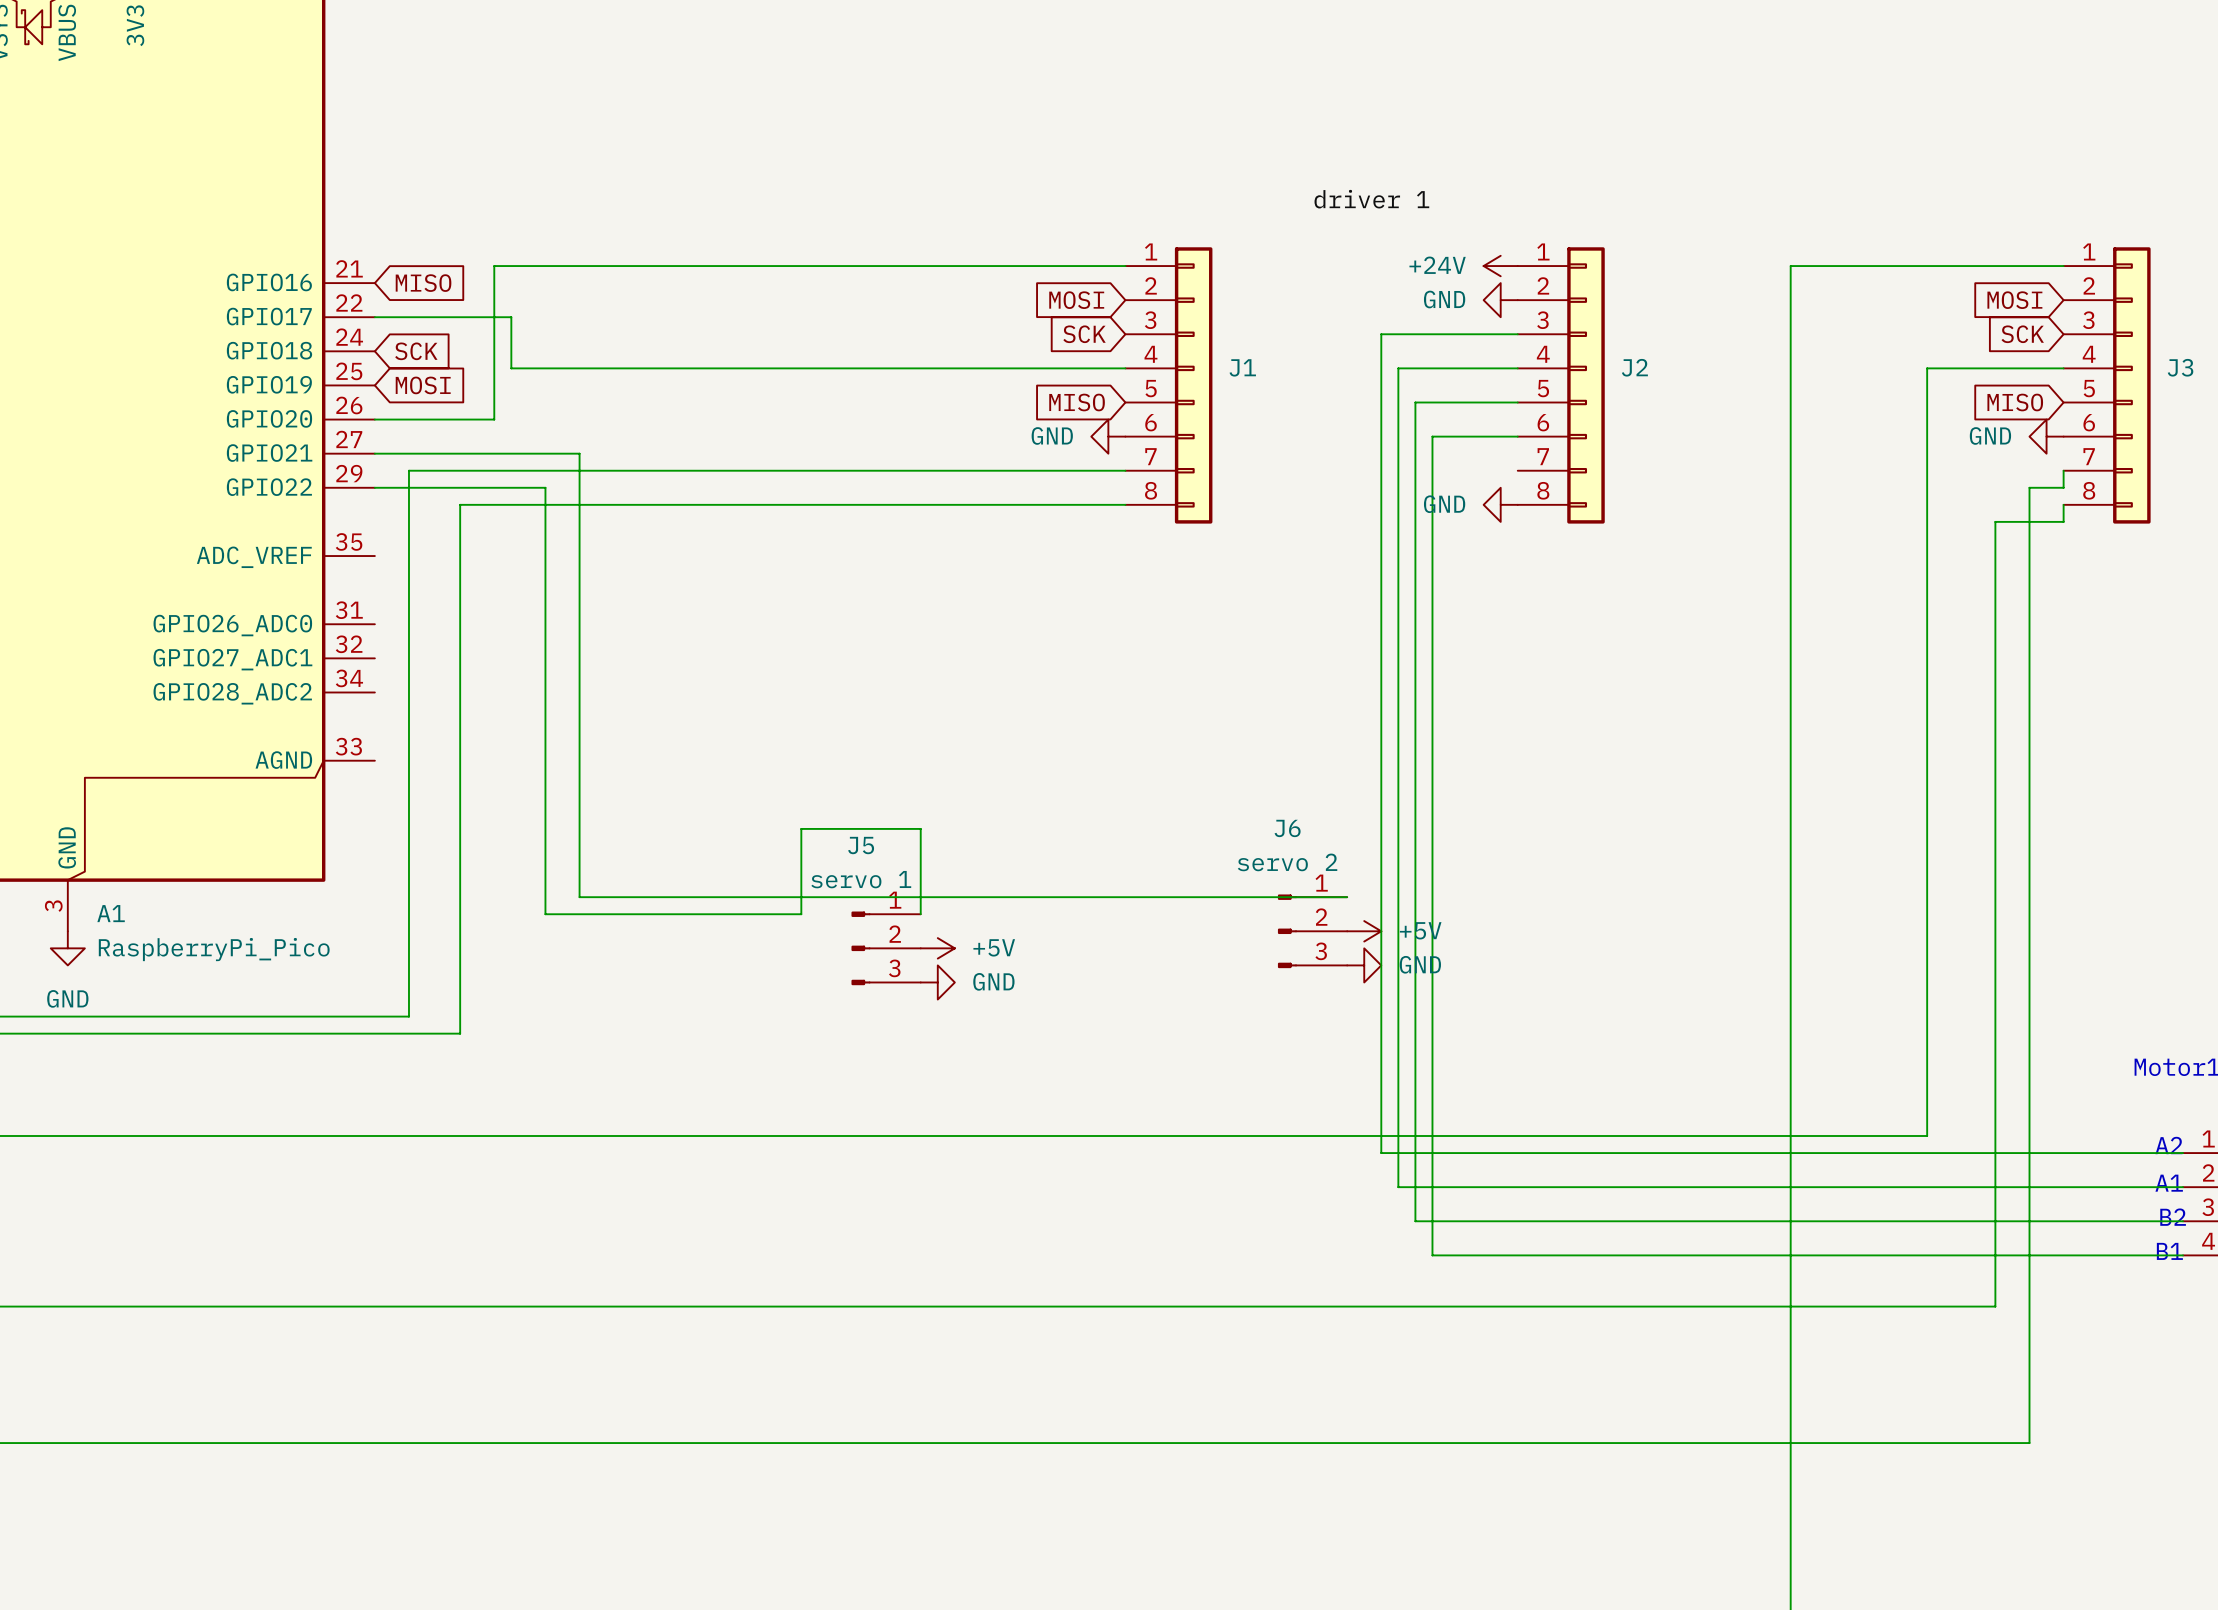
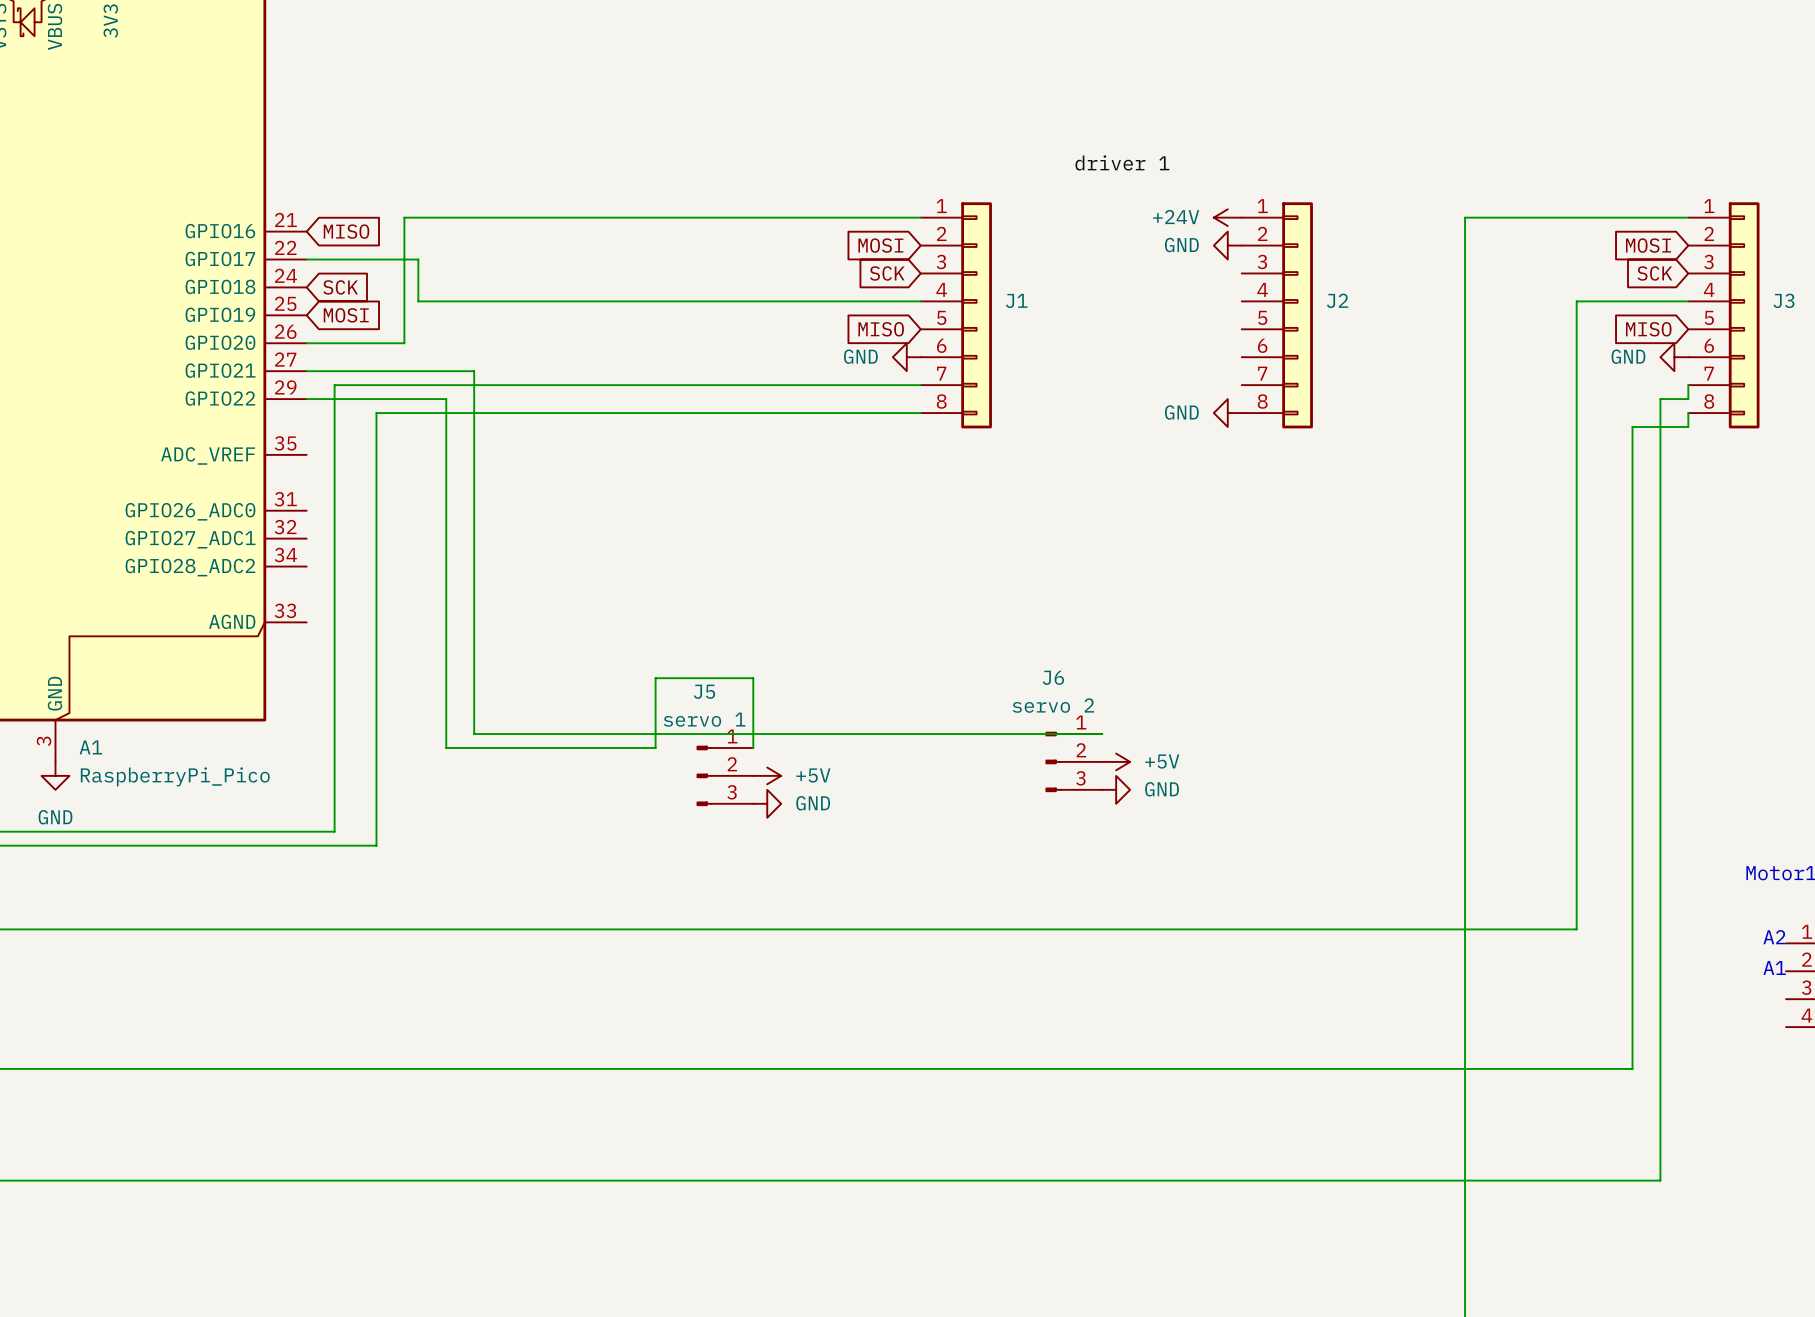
wire: (1517, 334) (1381, 334) (1381, 1153) (2183, 1153) -> none
wire: (1517, 368) (1398, 368) (1398, 1187) (2183, 1187) -> none
wire: (1517, 402) (1415, 402) (1415, 1221) (2183, 1221) -> none
wire: (1517, 436) (1432, 436) (1432, 1255) (2183, 1255) -> none
text: B2 (2173, 1217) -> none
text: B1 (2169, 1251) -> none

